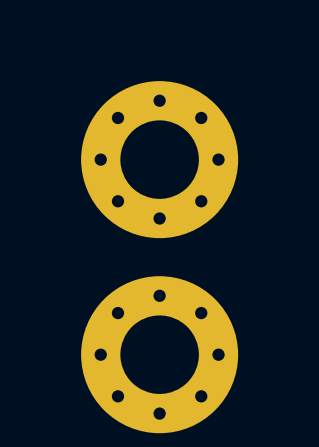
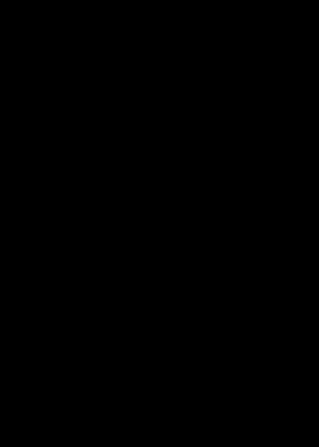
part: (159, 159) -> none
part: (159, 354) -> none

